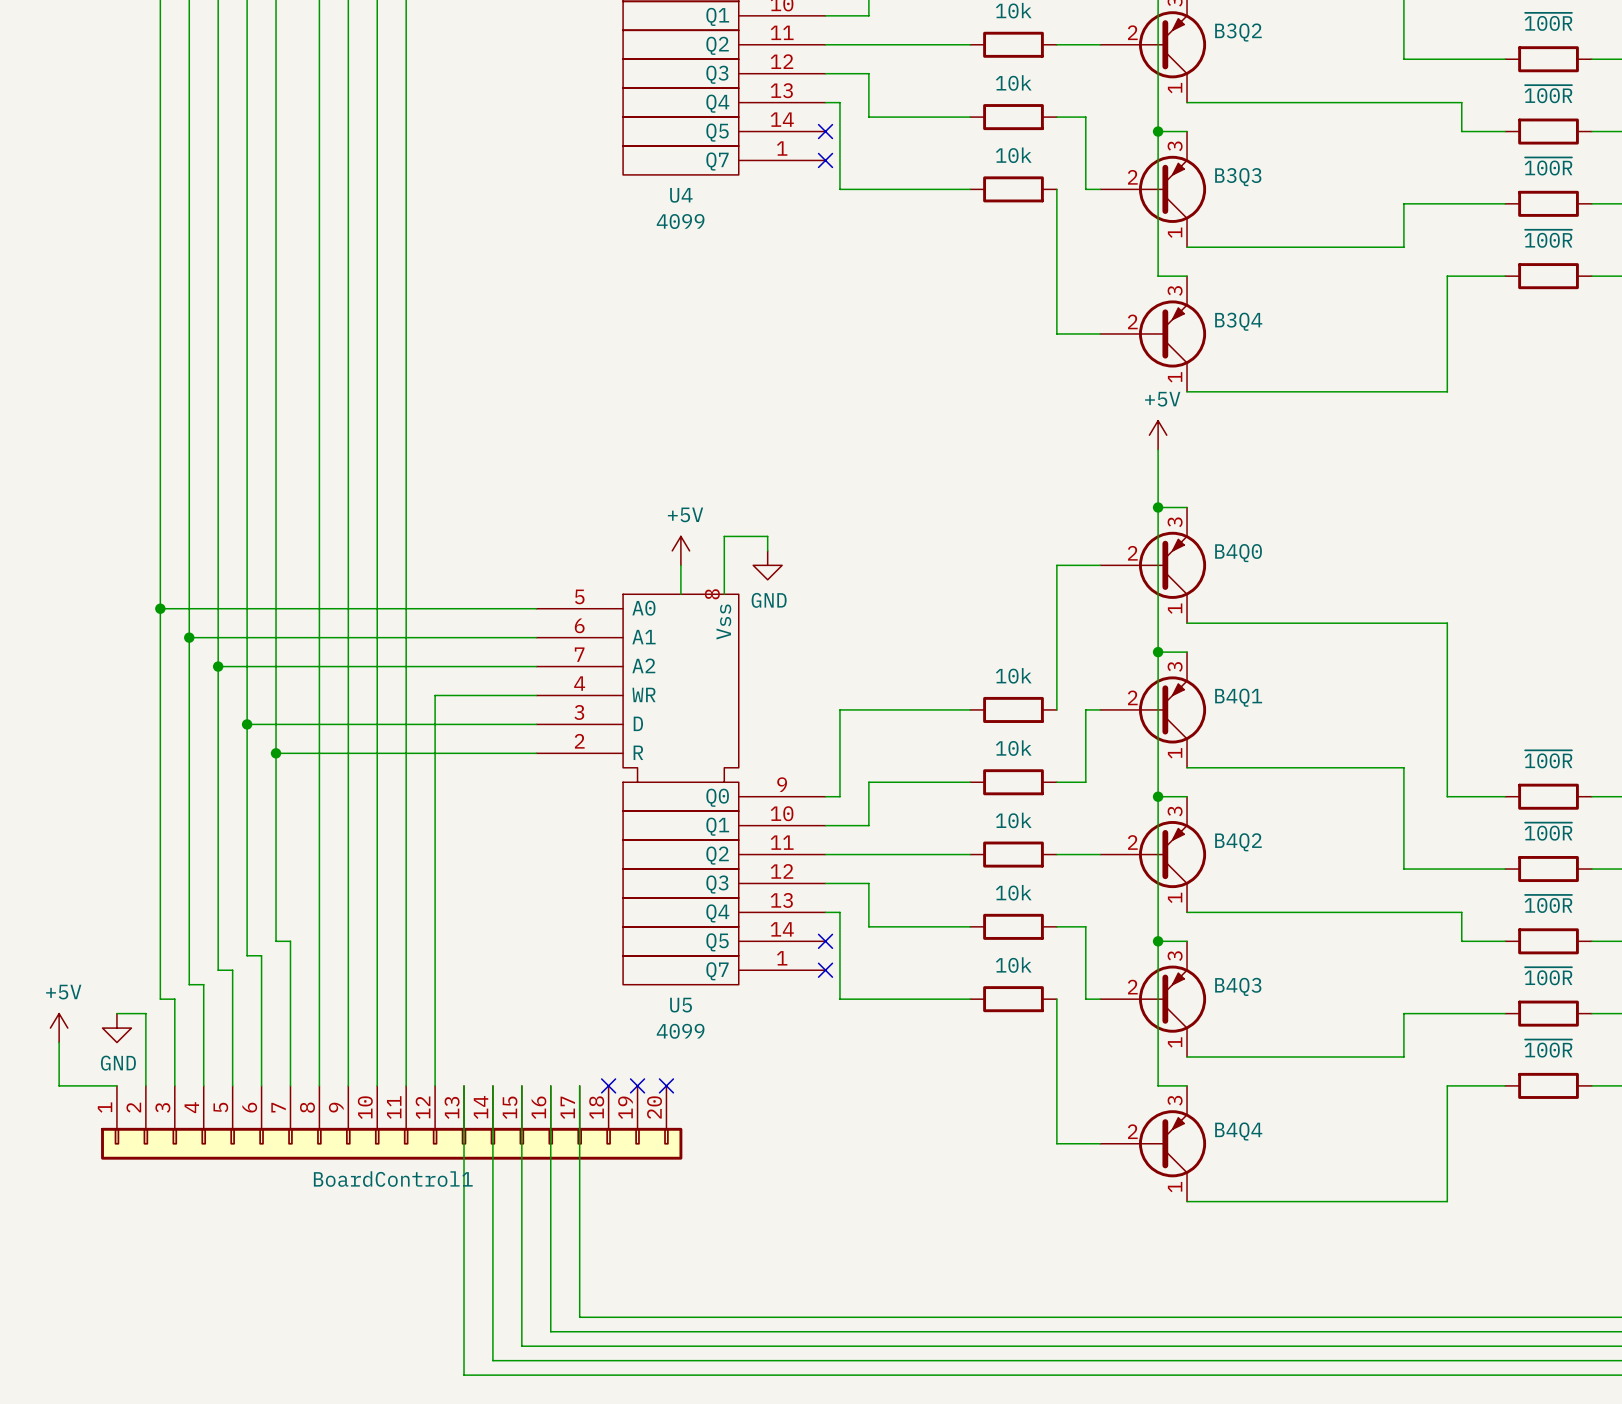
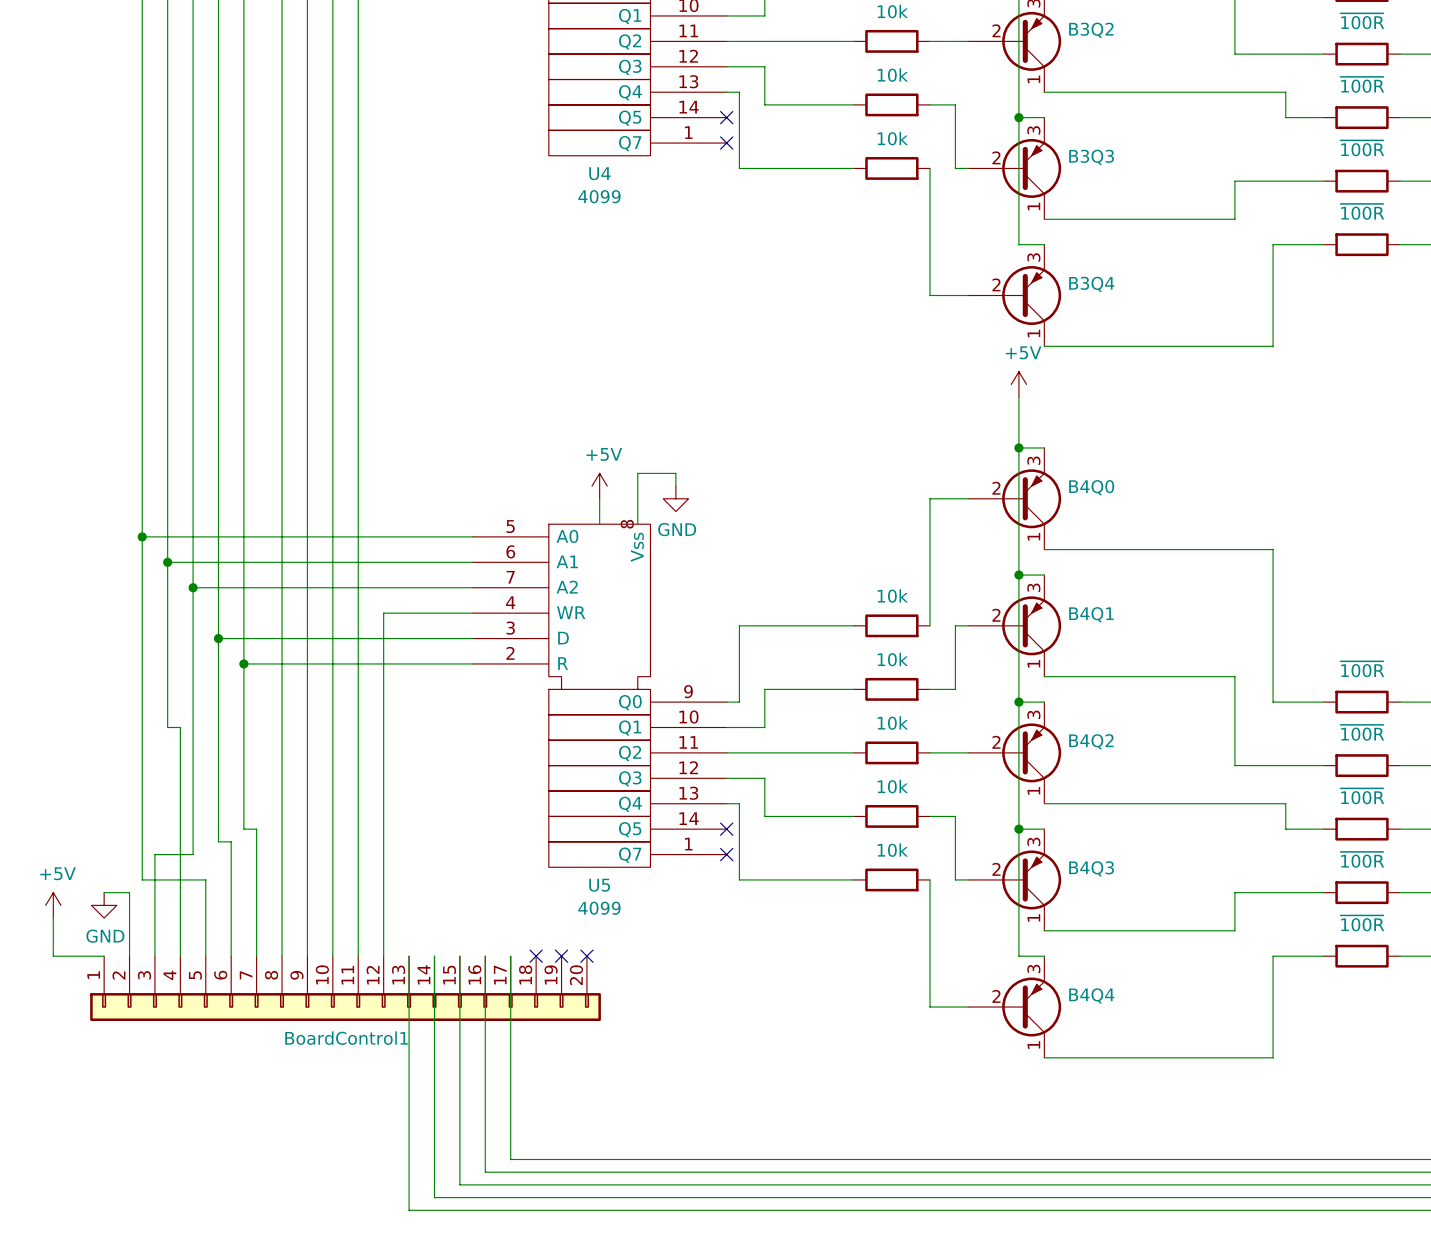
wire: (189, 825) (189, 984) (203, 984) -> (167, 727) (180, 727) (180, 867)
wire: (218, 970) (232, 970) (232, 999) -> (193, 854) (154, 854) (154, 879) (205, 879)

